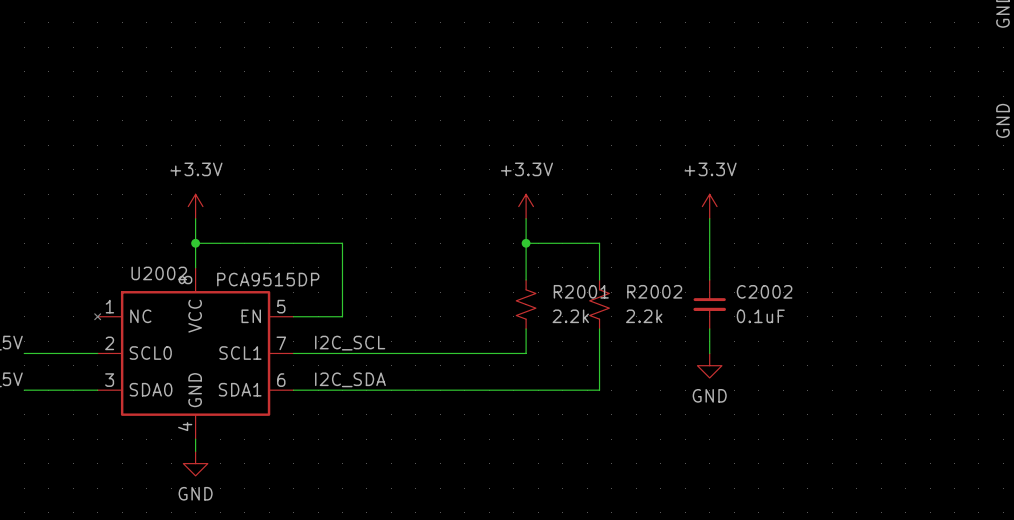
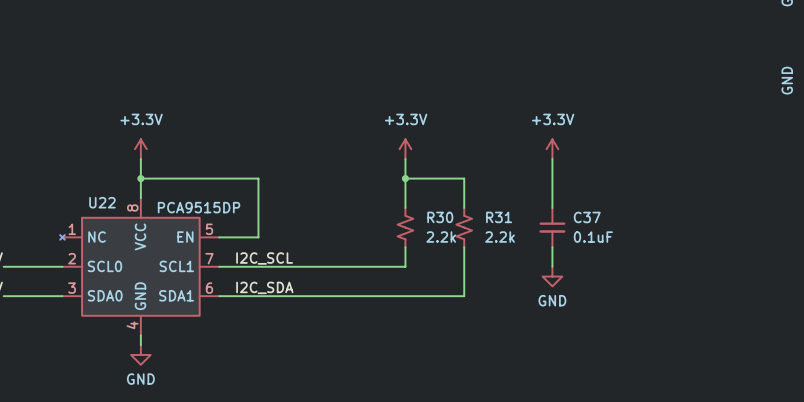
U2002 name: U2002 (159, 273) -> U22 (102, 202)
R2001 name: R2001 (581, 291) -> R30 (440, 217)
R2002 name: R2002 (654, 291) -> R31 (499, 217)
C2002 name: C2002 (764, 291) -> C37 (587, 217)

